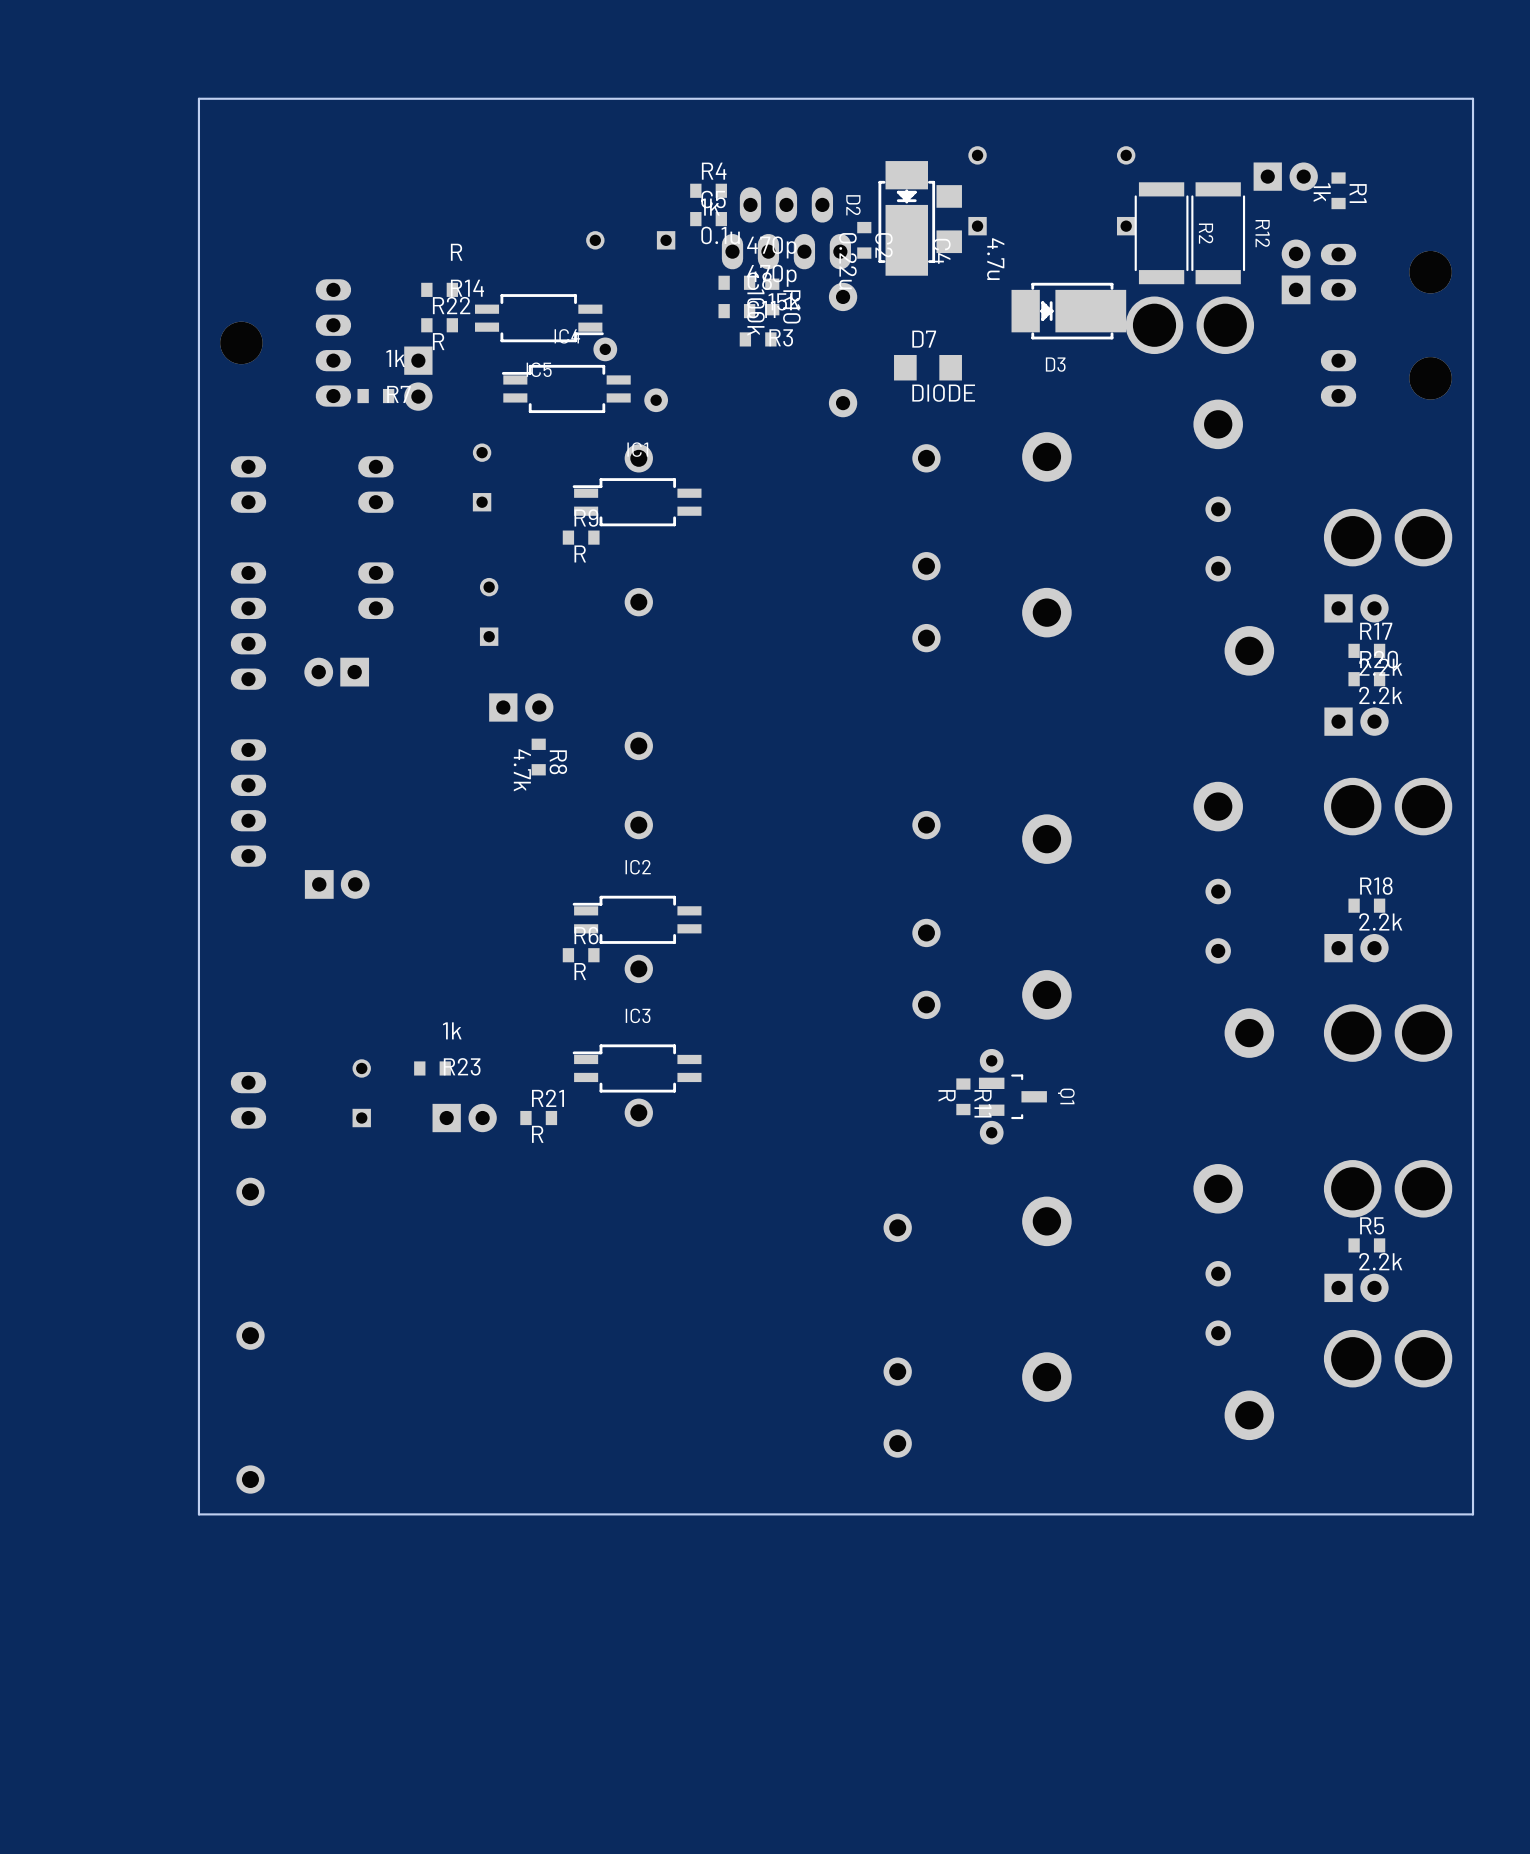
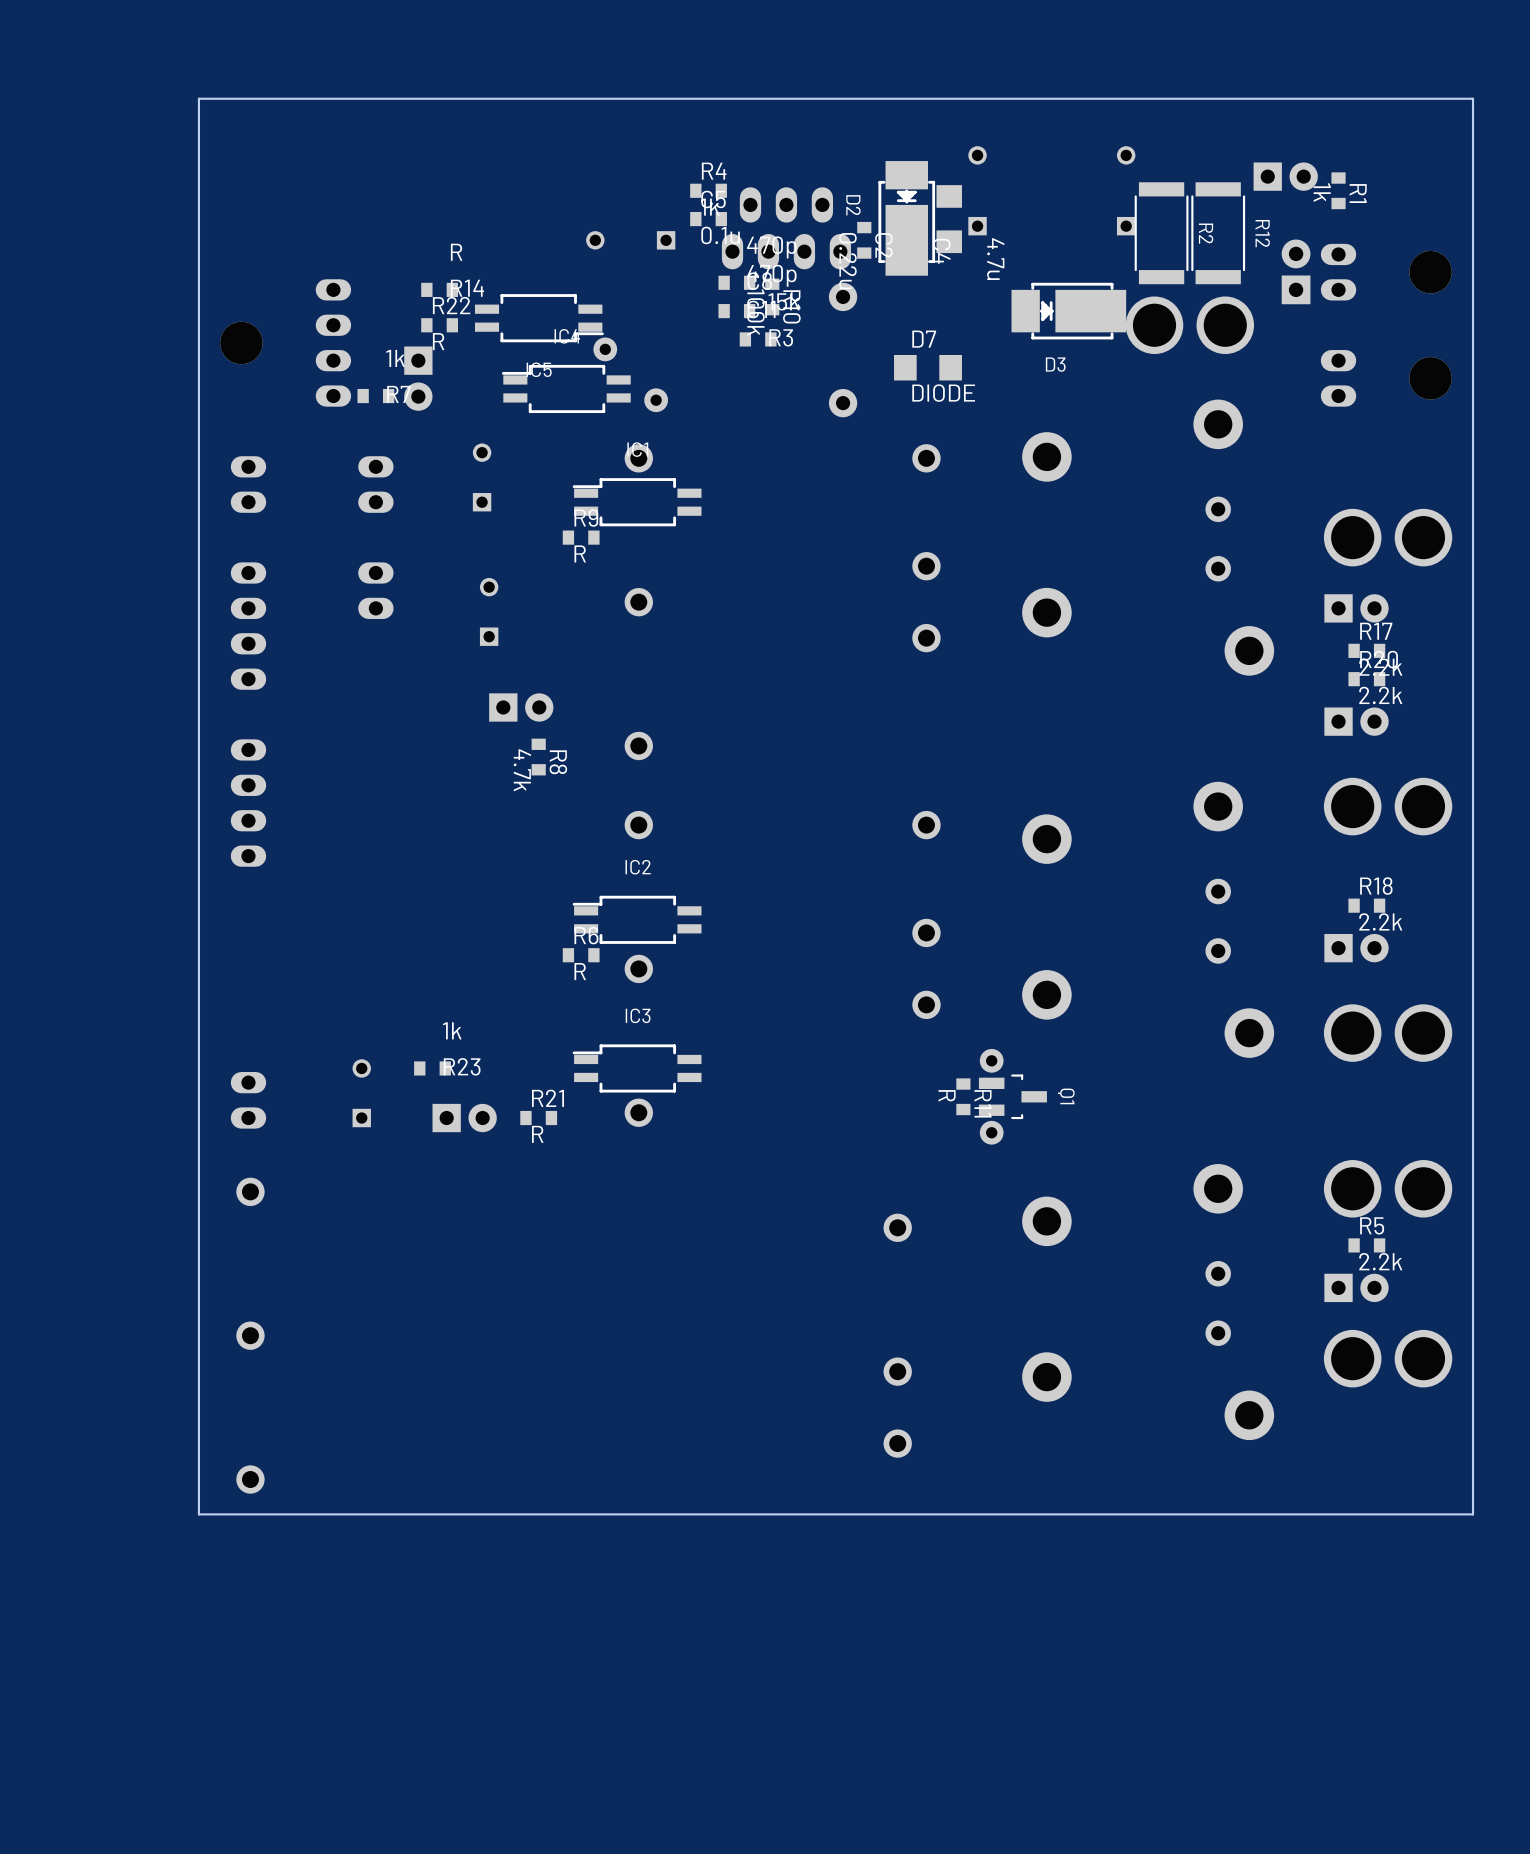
part: (336, 672) -> none
part: (337, 884) -> none

